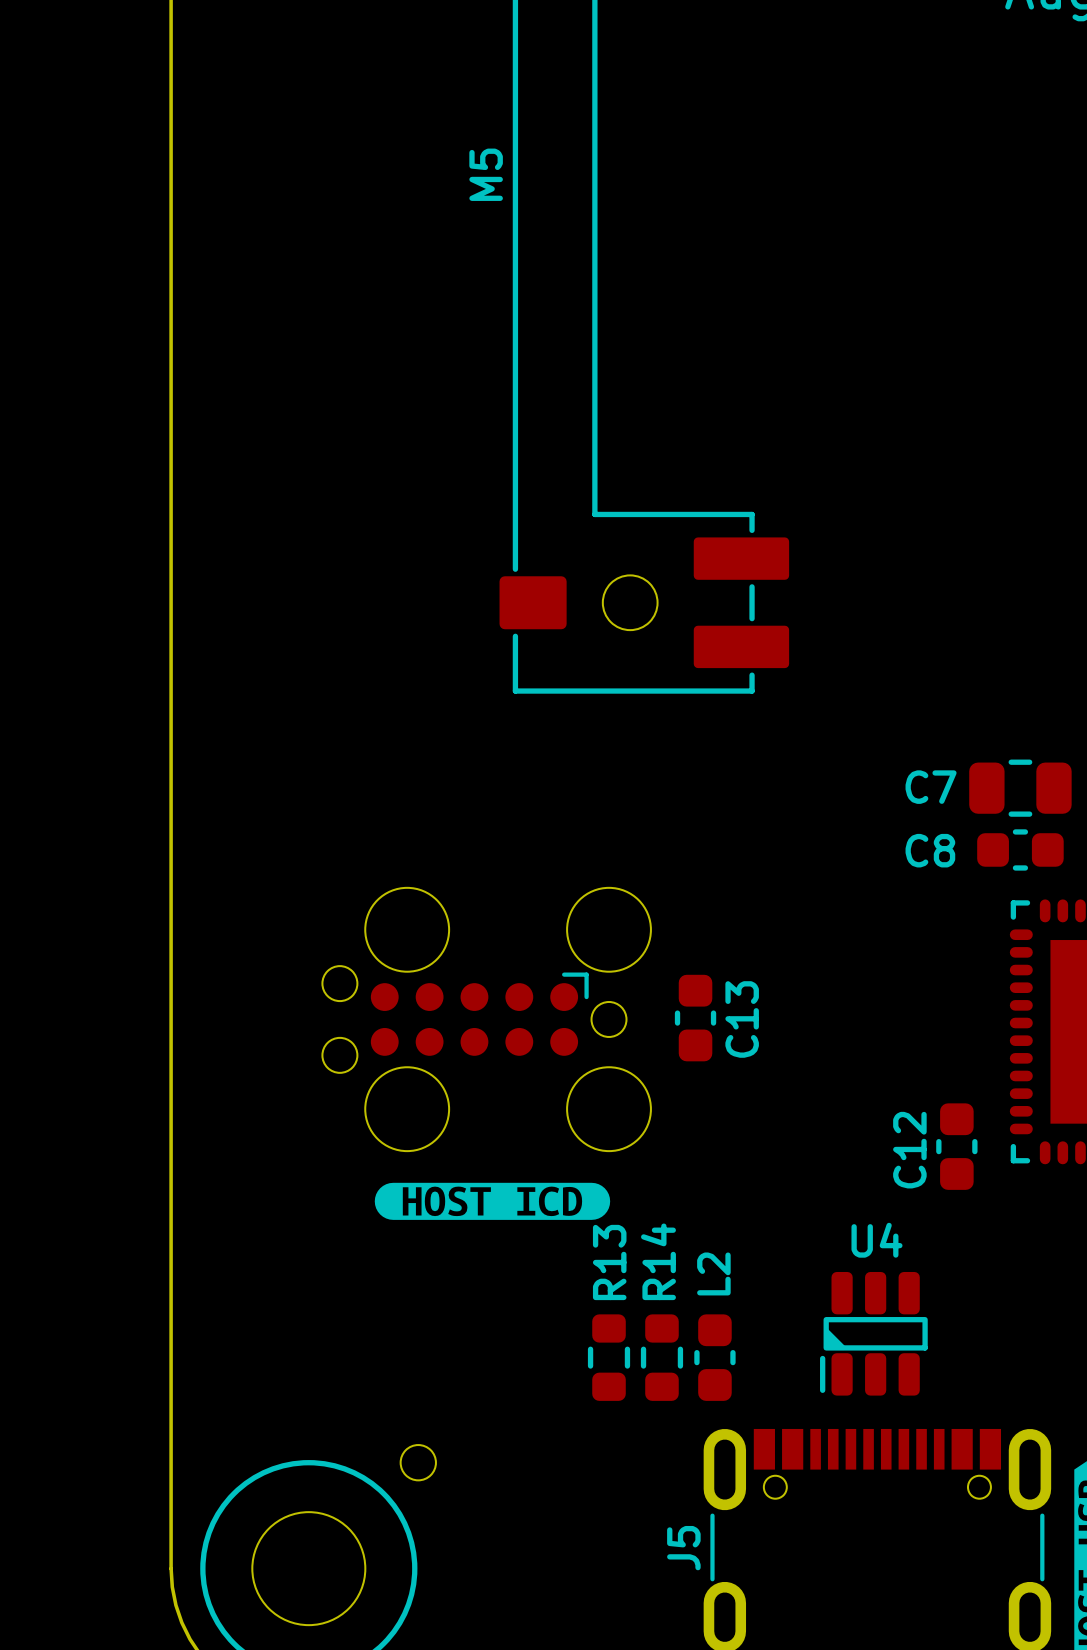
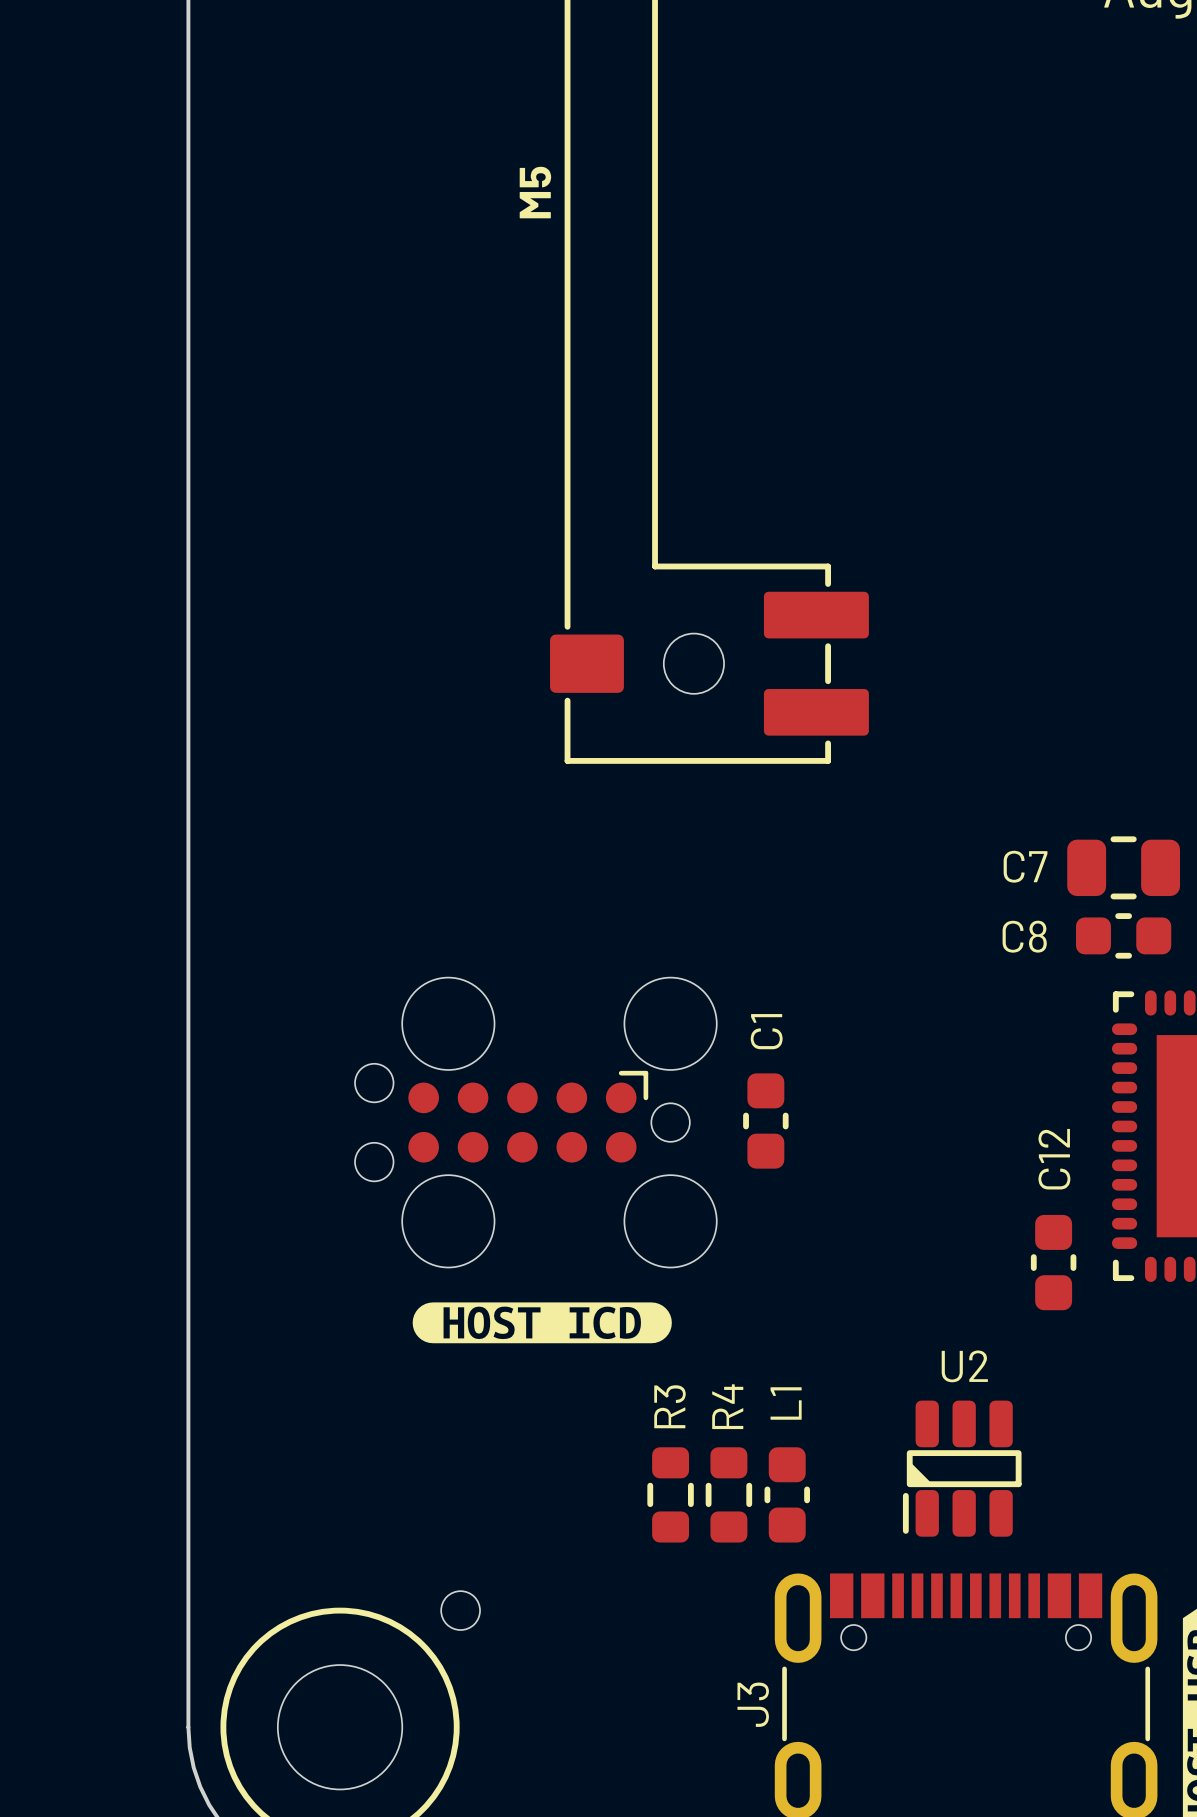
C13 name: C13 (742, 1019) -> C1 (766, 1031)
C12 name position: C12 (909, 1150) -> C12 (1054, 1159)
U4 name: U4 (876, 1240) -> U2 (964, 1366)
R14 name: R14 (658, 1261) -> R4 (727, 1406)
R13 name: R13 (609, 1262) -> R3 (669, 1406)
L2 name: L2 (713, 1273) -> L1 (786, 1403)
J5 name: J5 (683, 1548) -> J3 (753, 1704)

